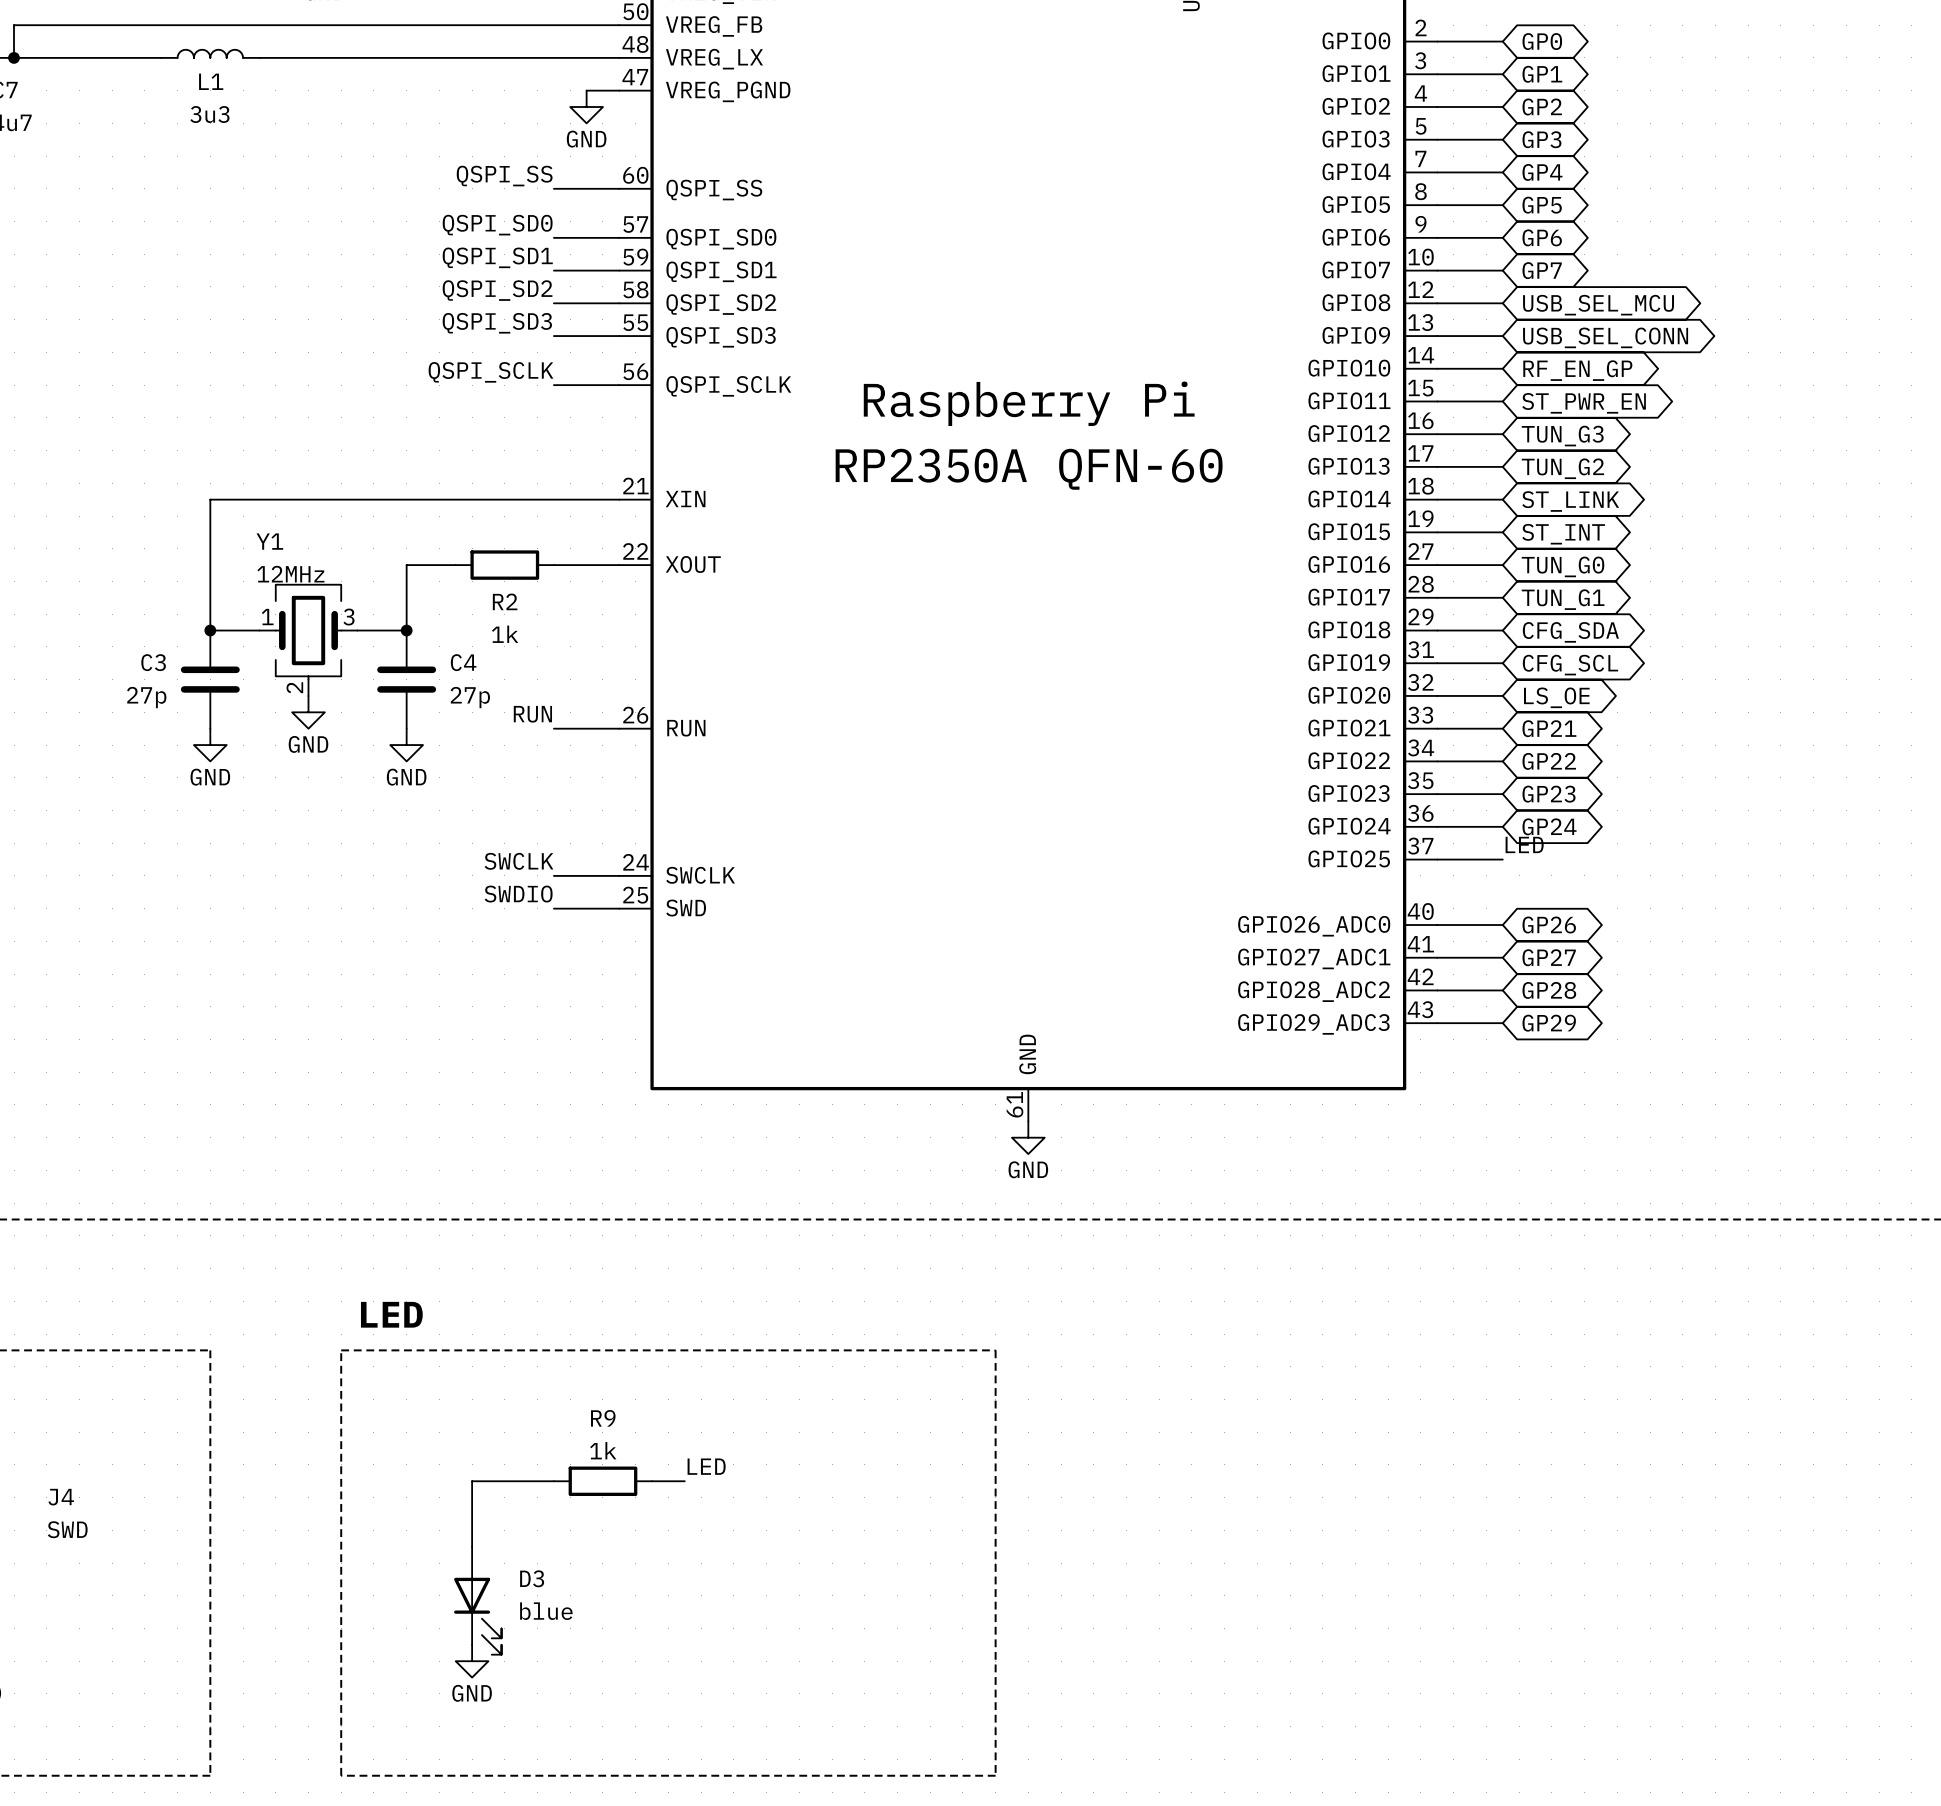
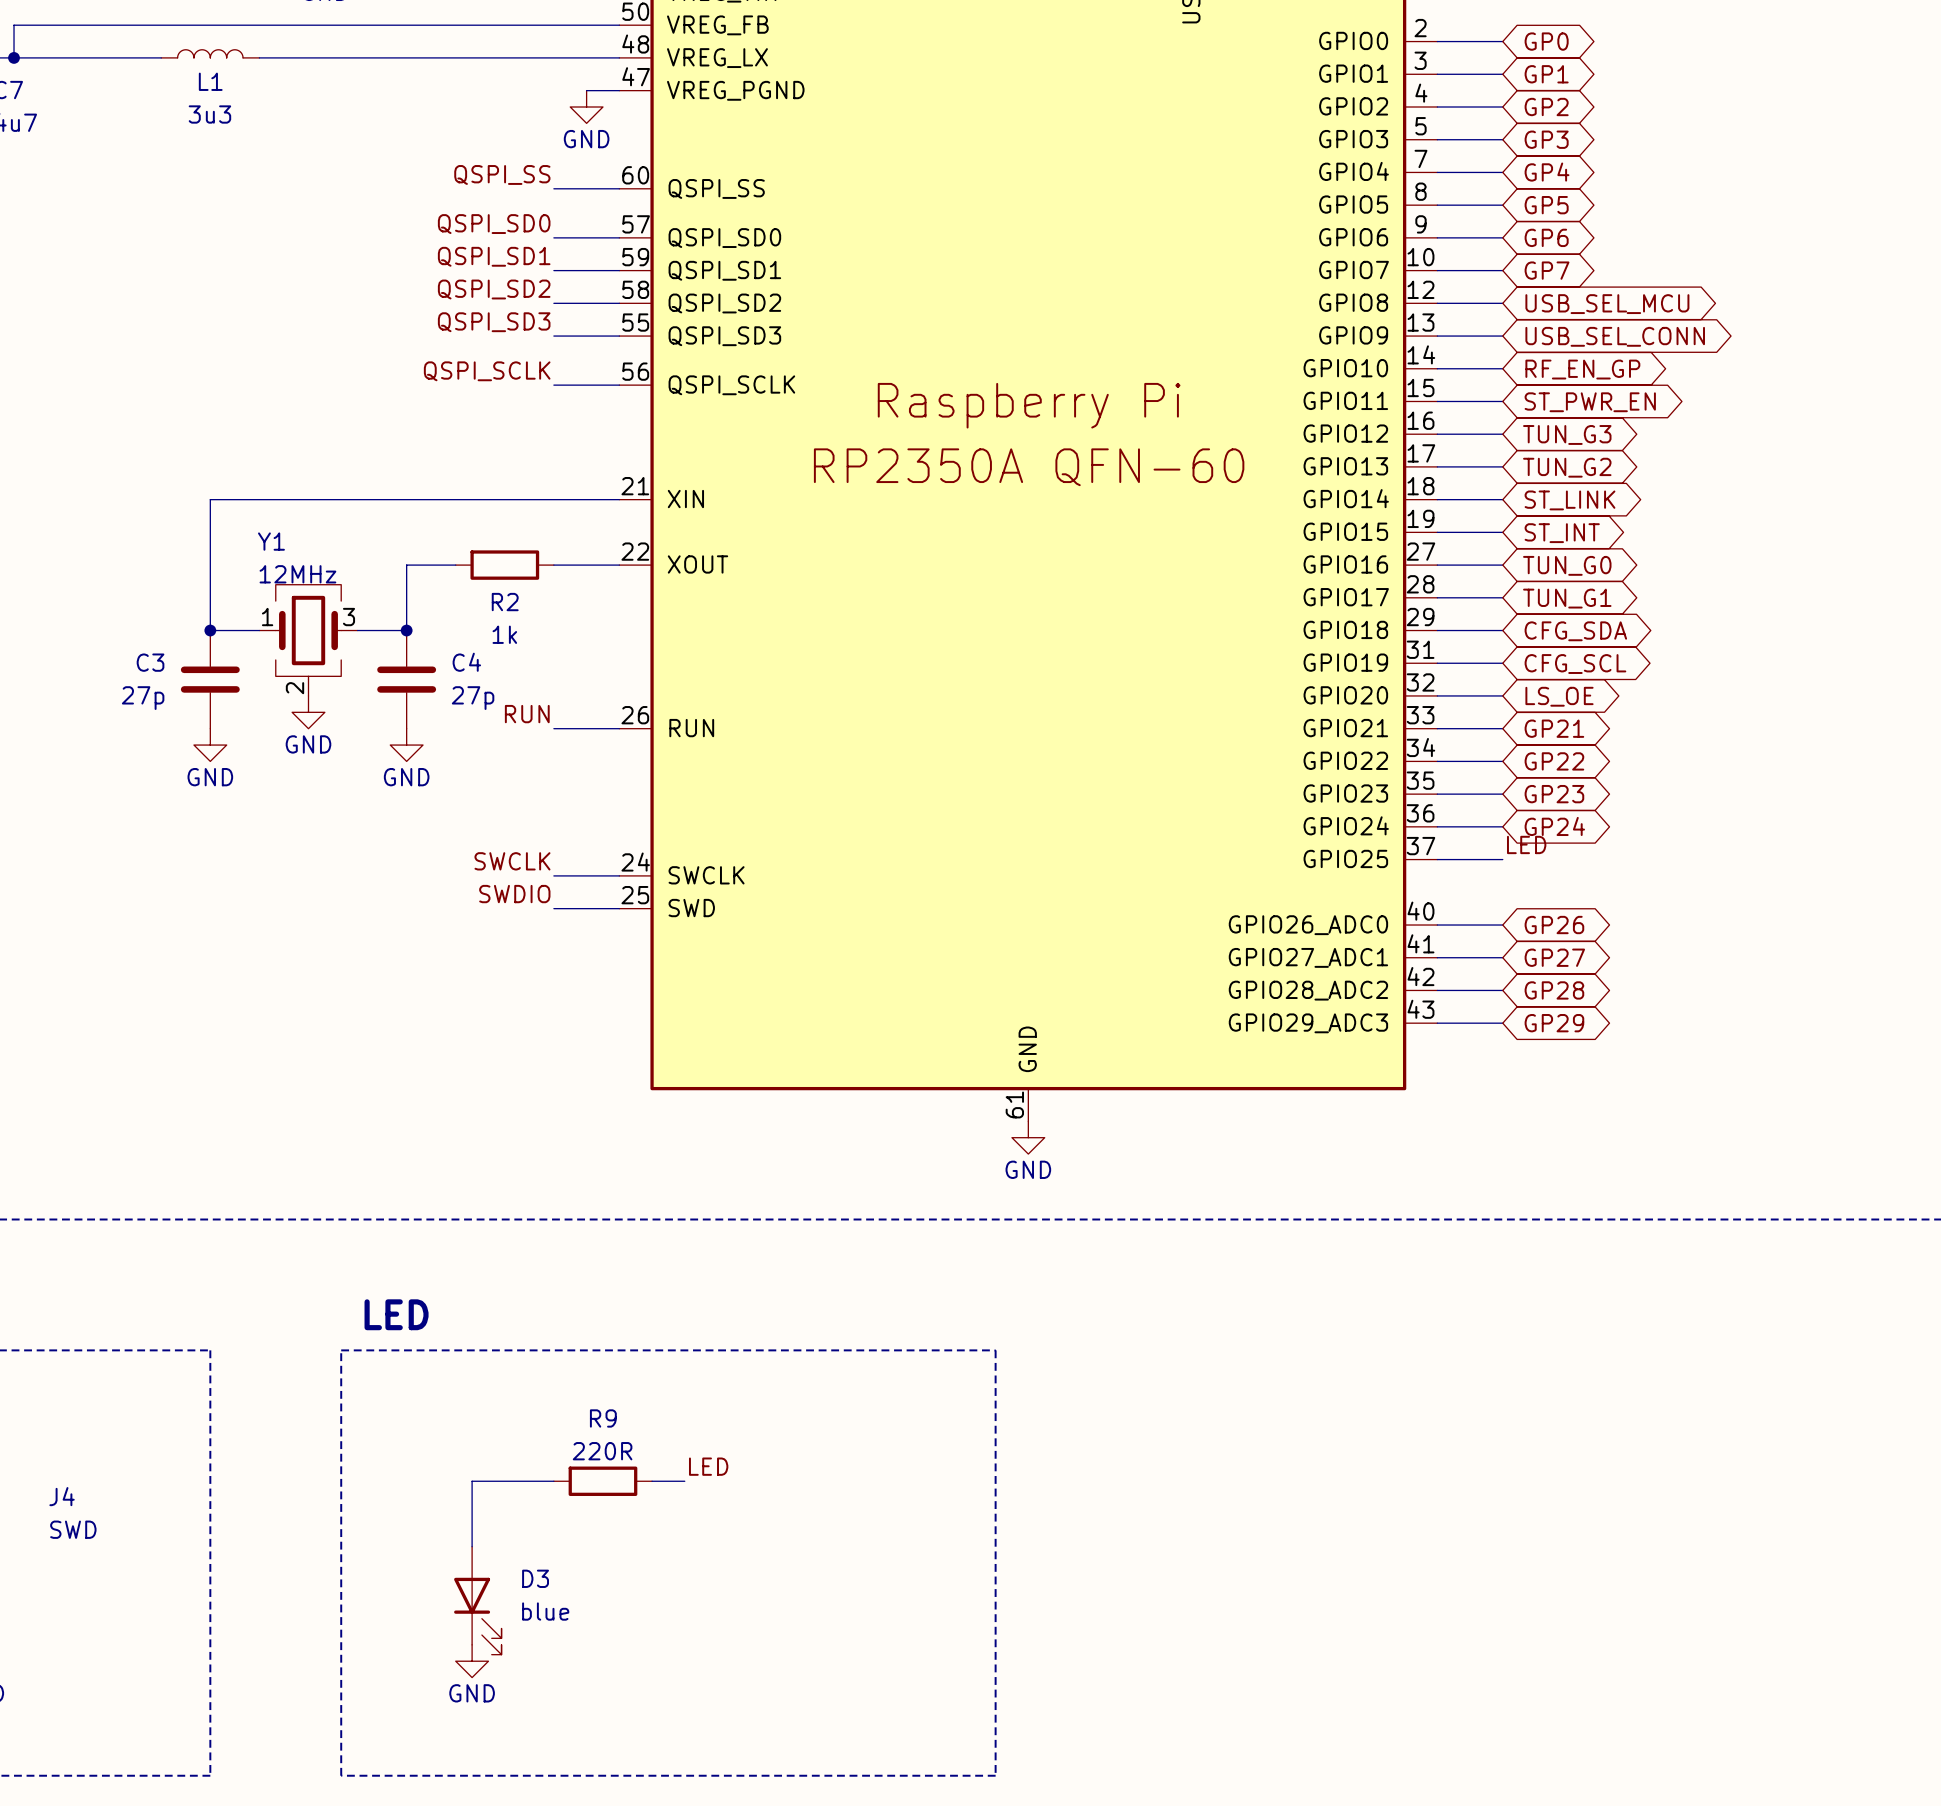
R9 value: 1k (603, 1450) -> 220R (602, 1451)

